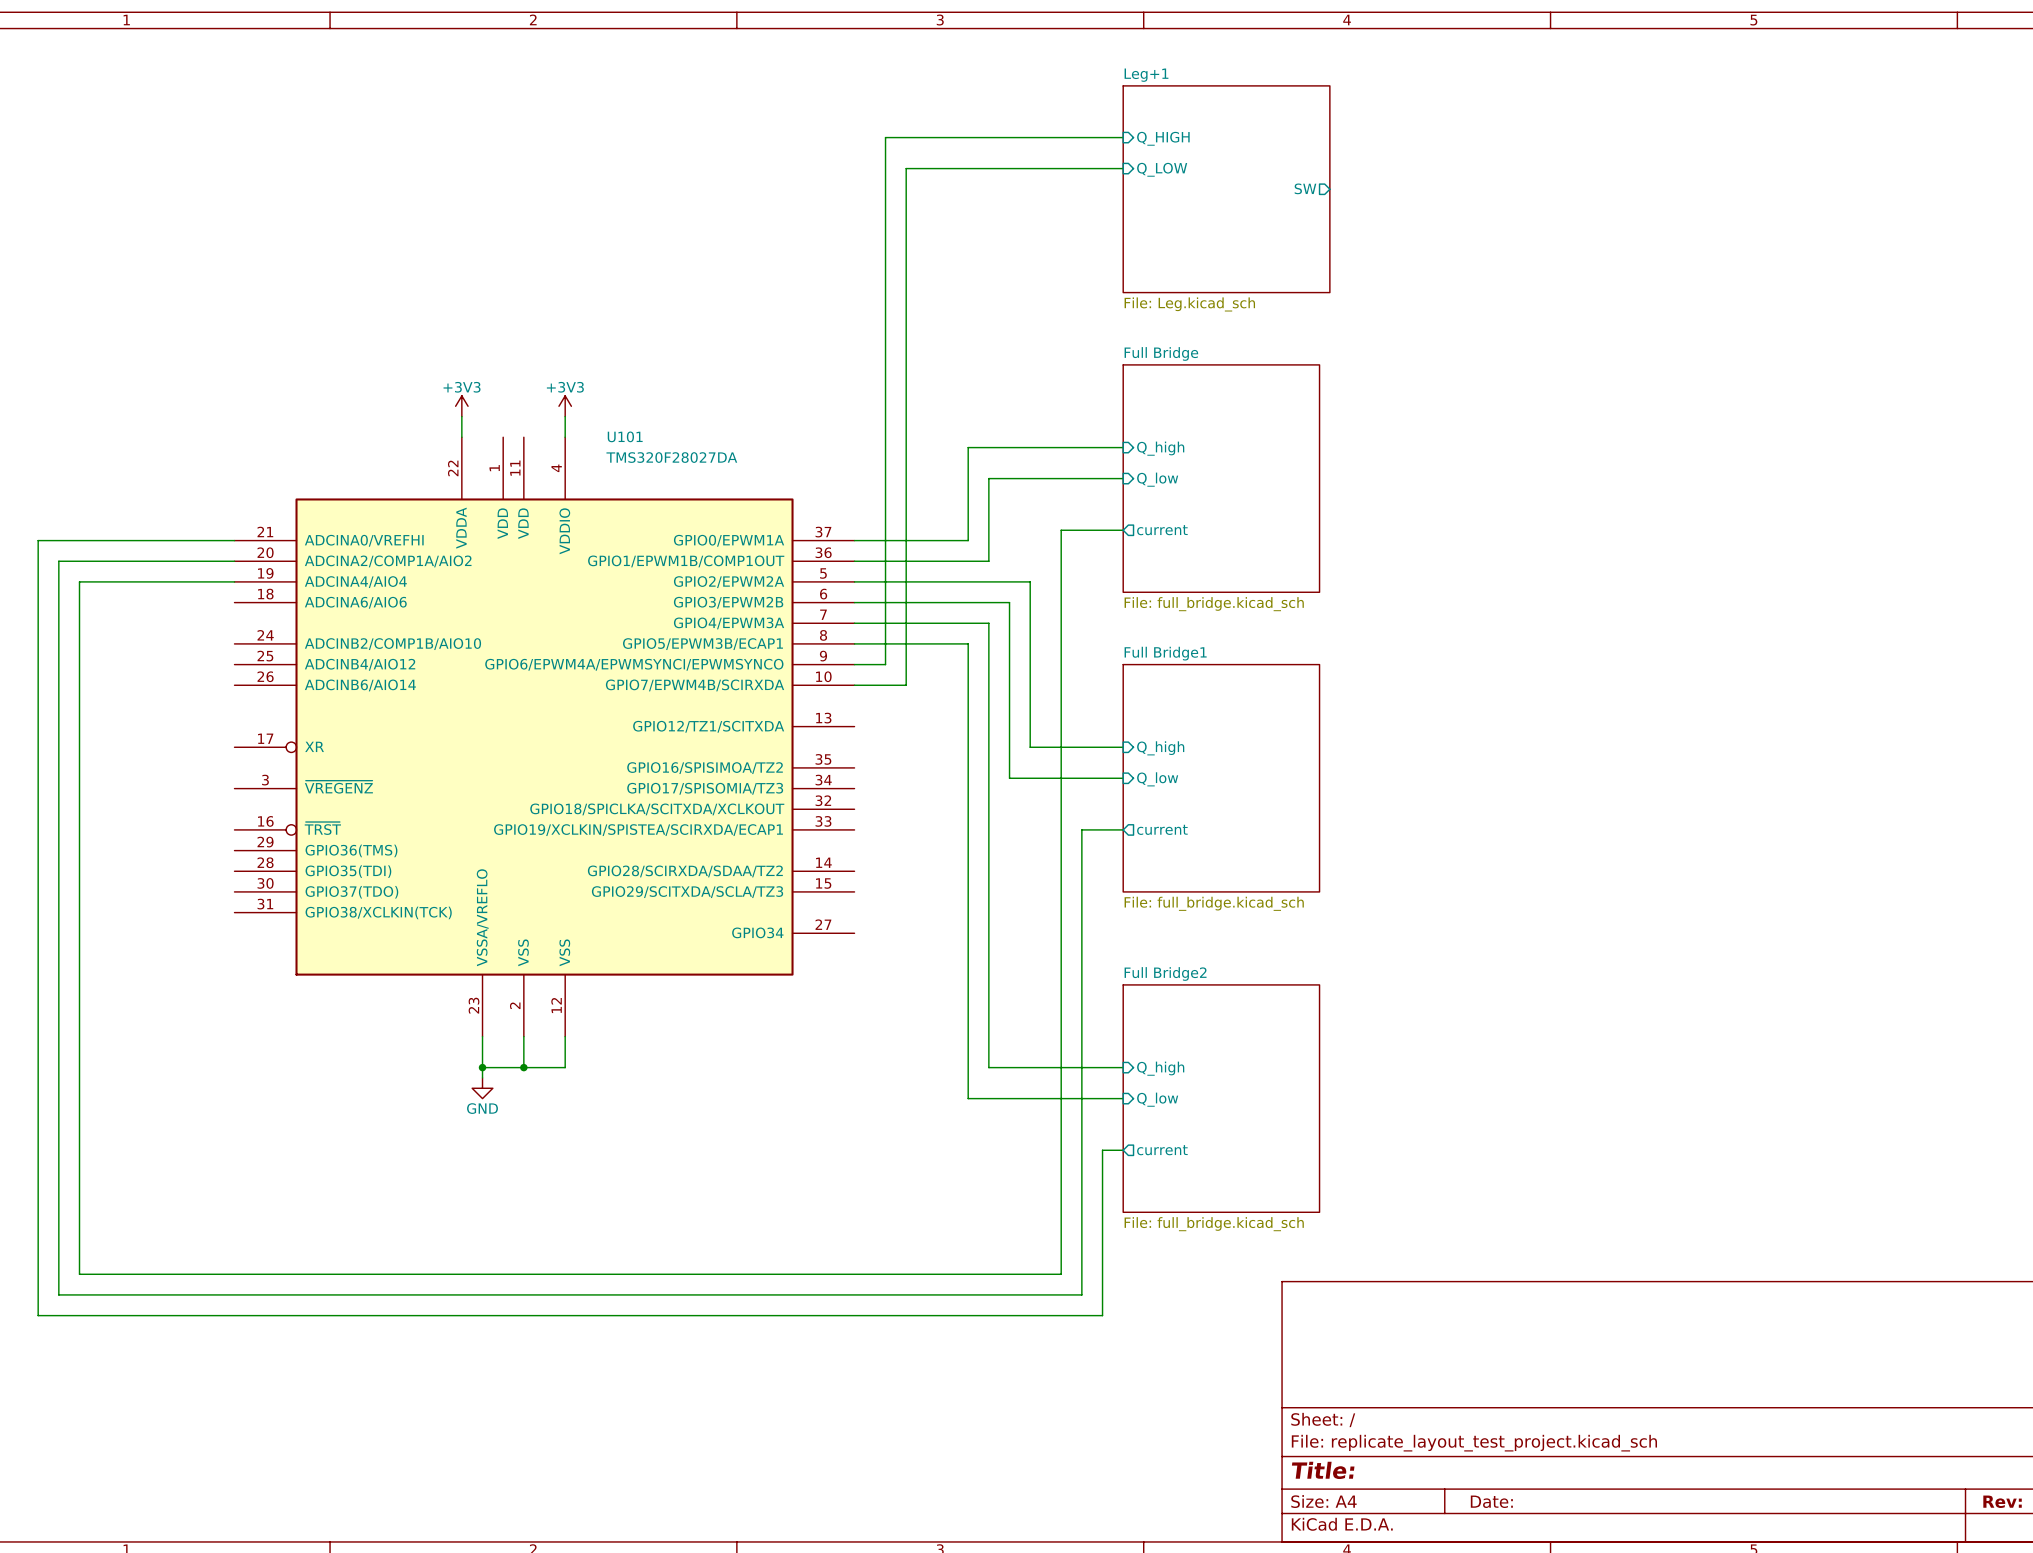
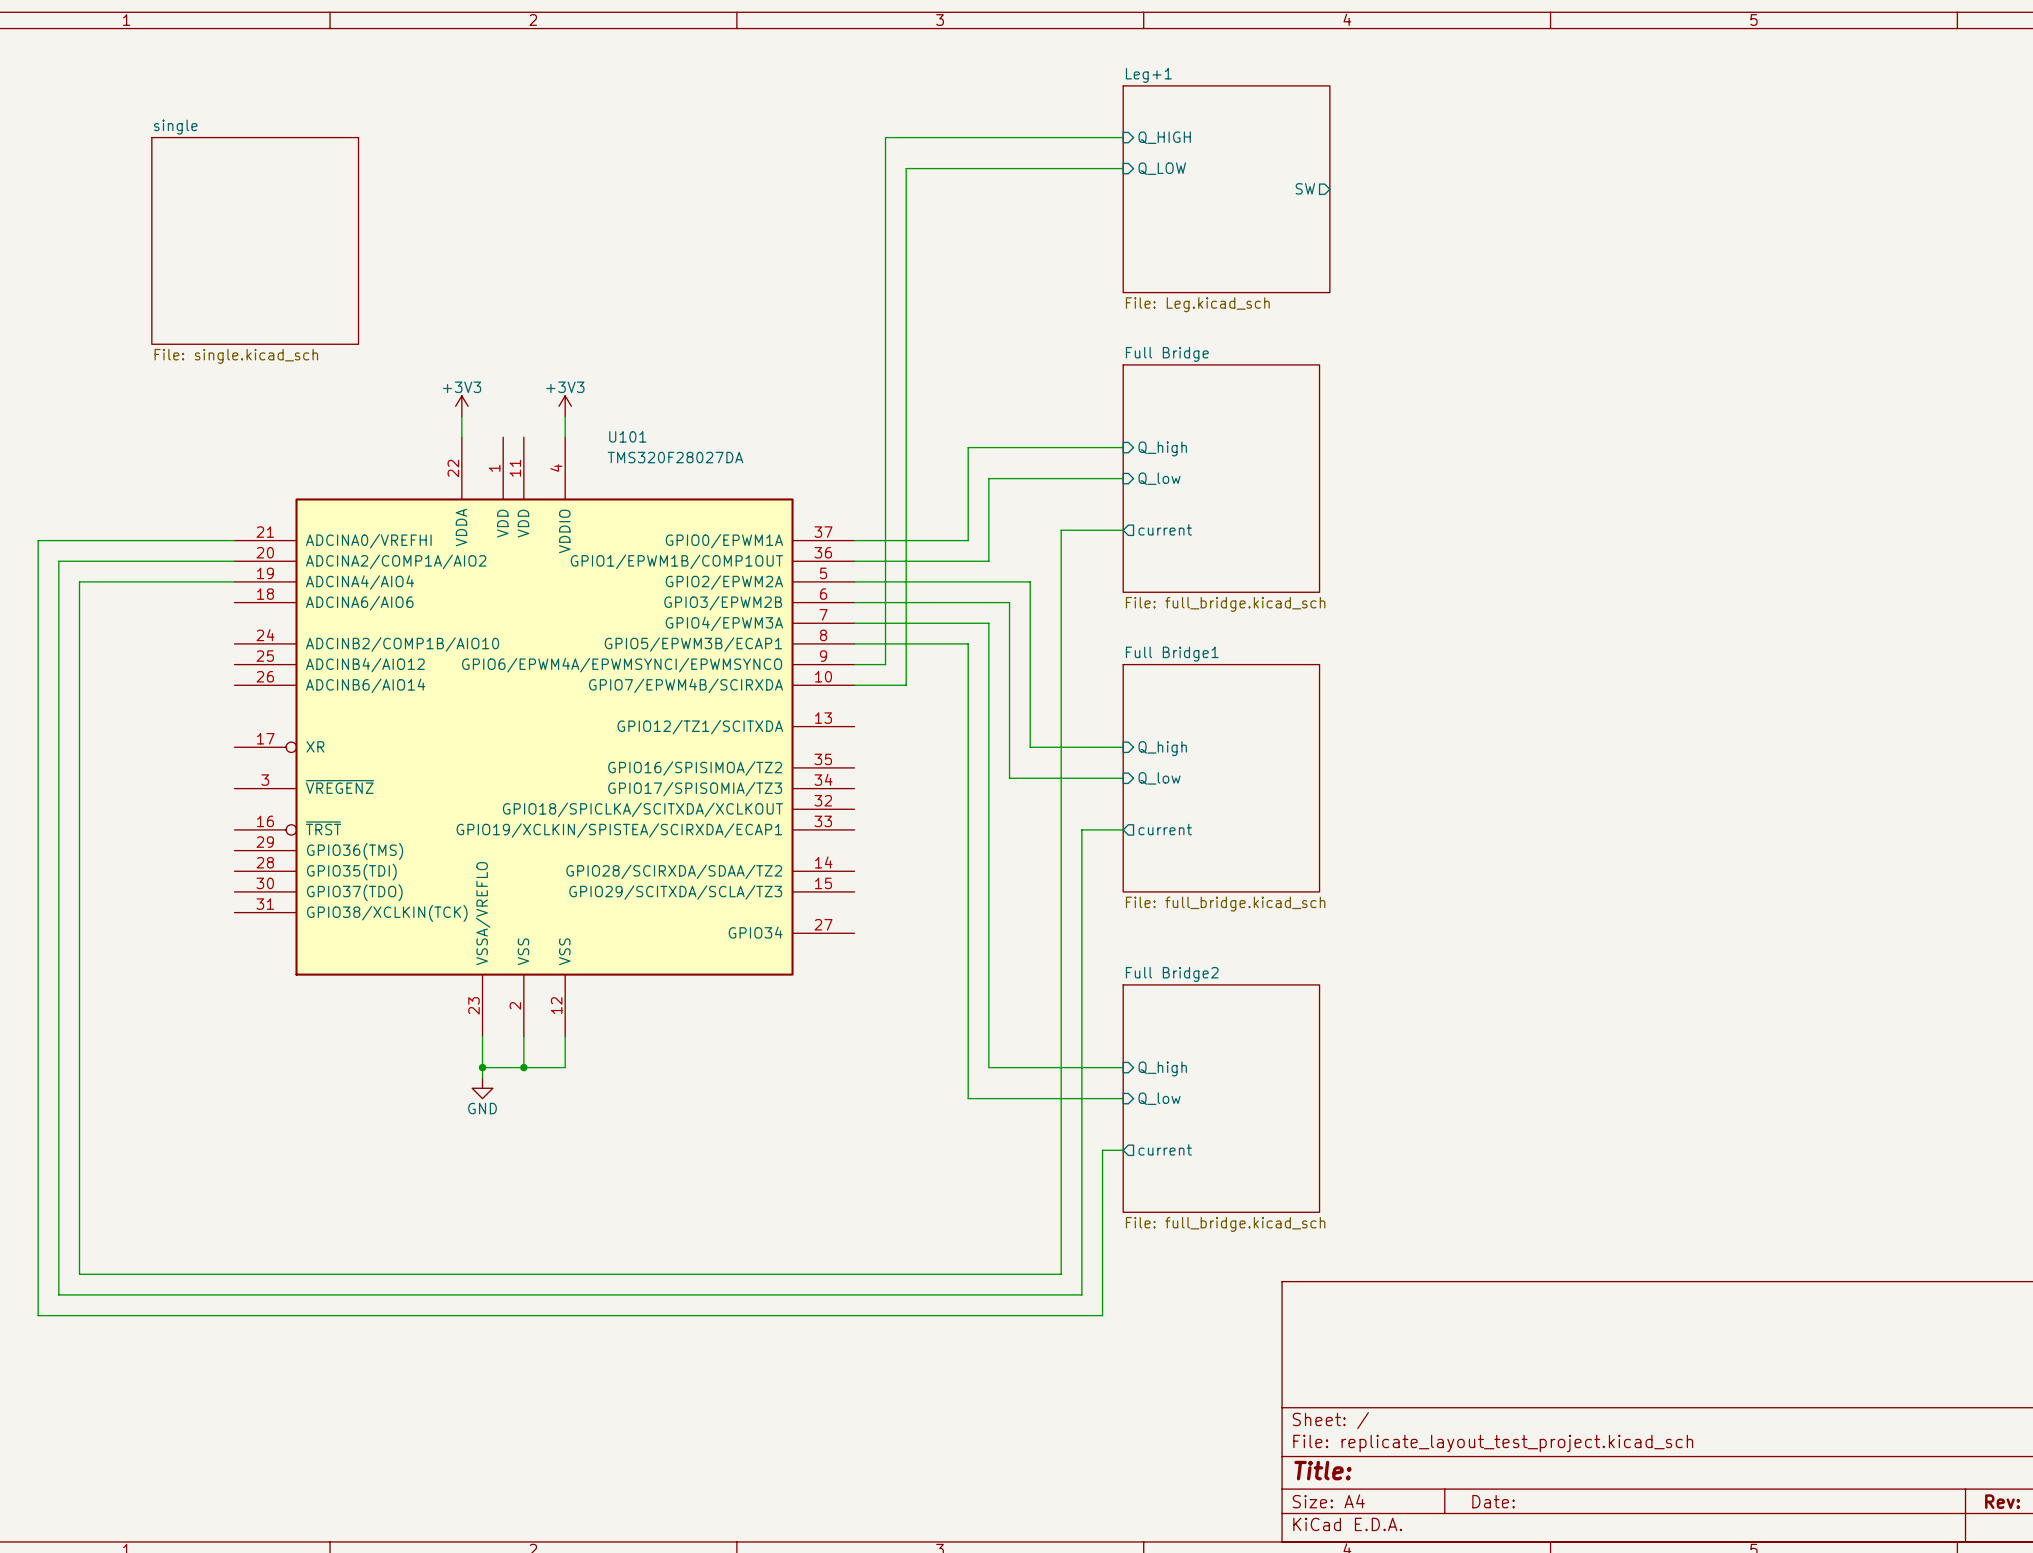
sheet single: none -> File: single.kicad_sch (255, 240)

